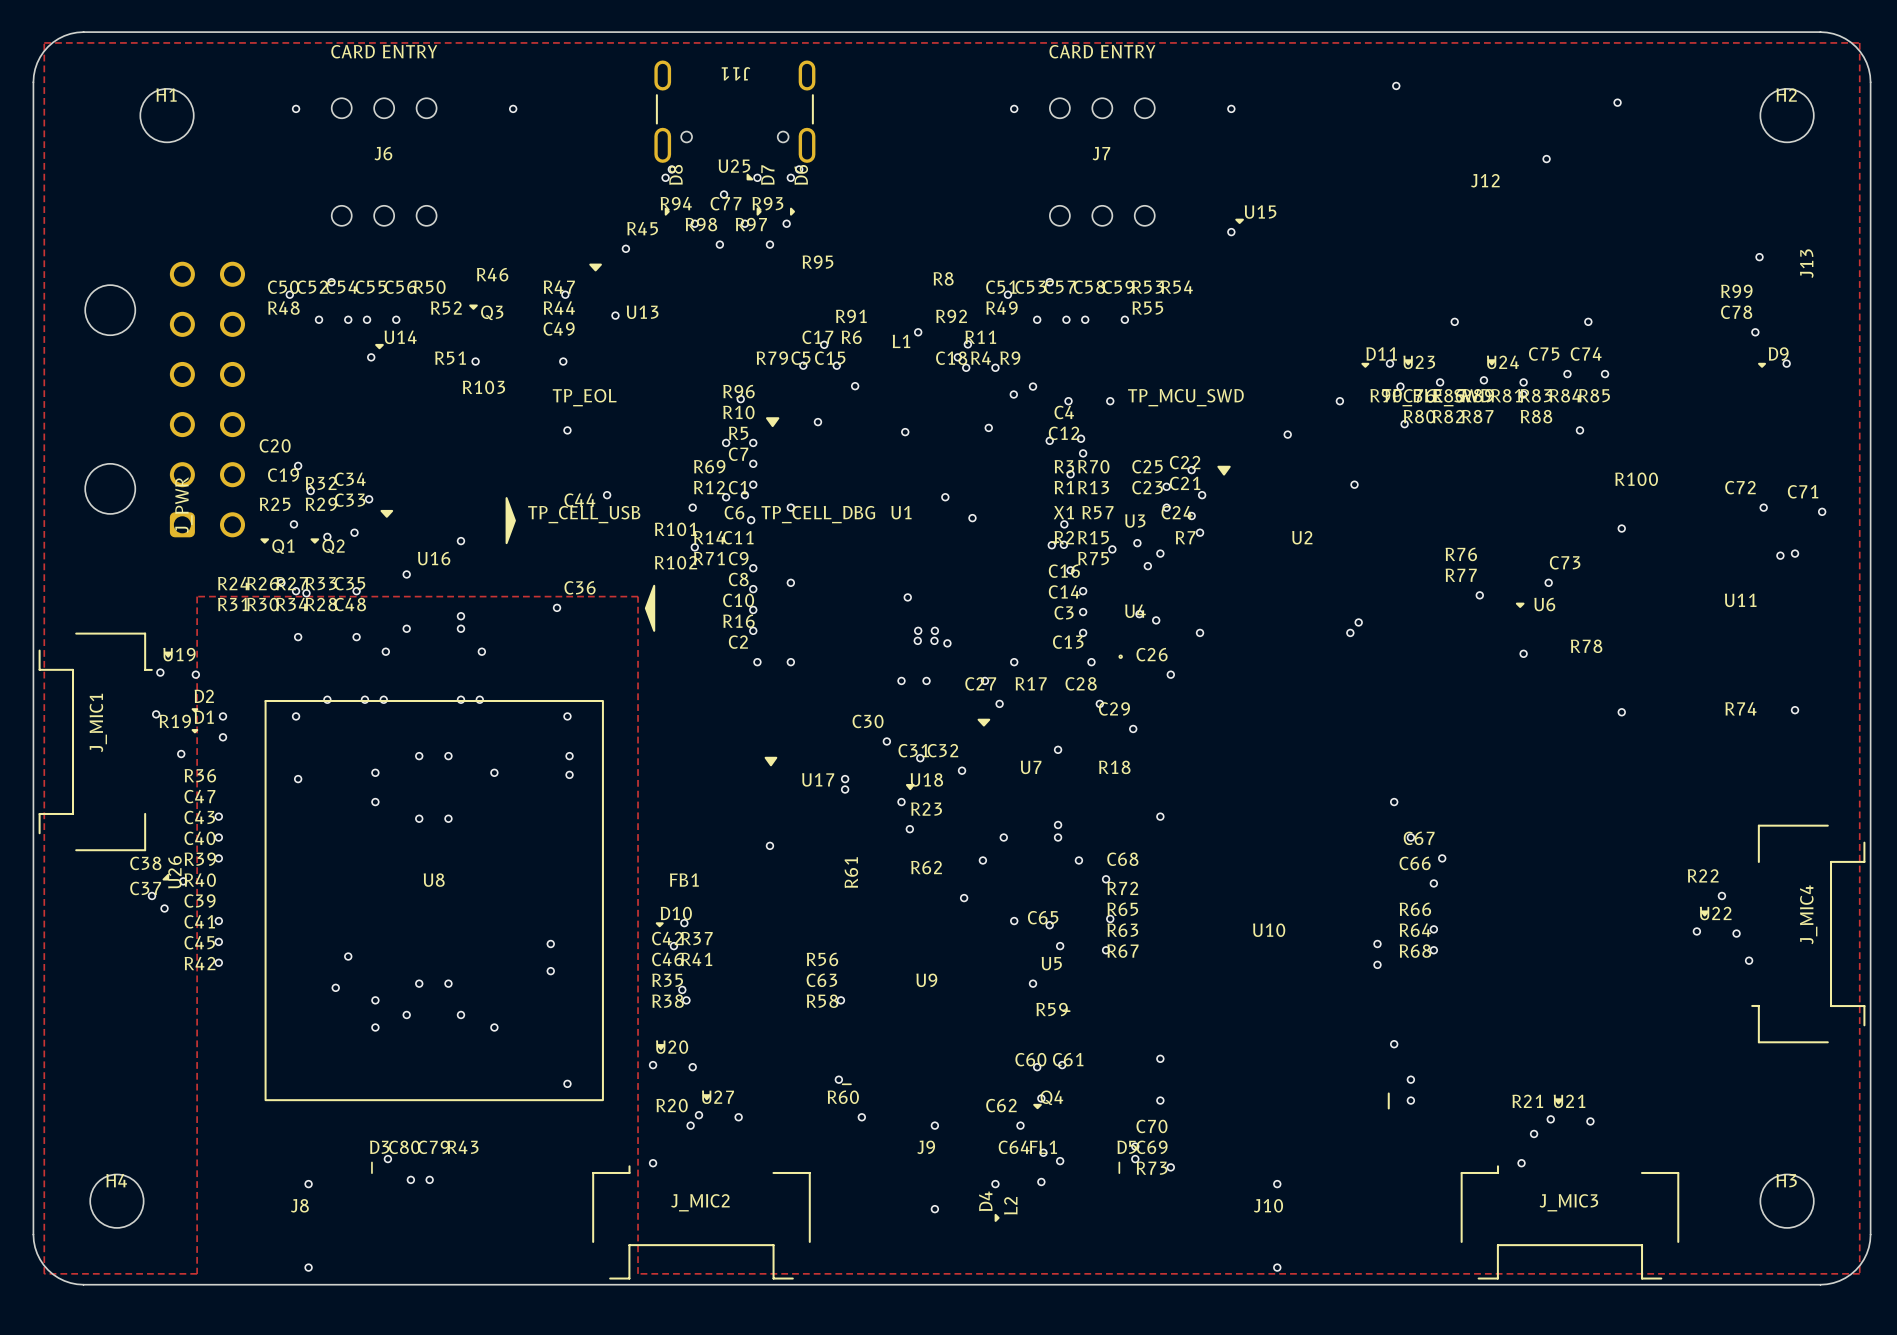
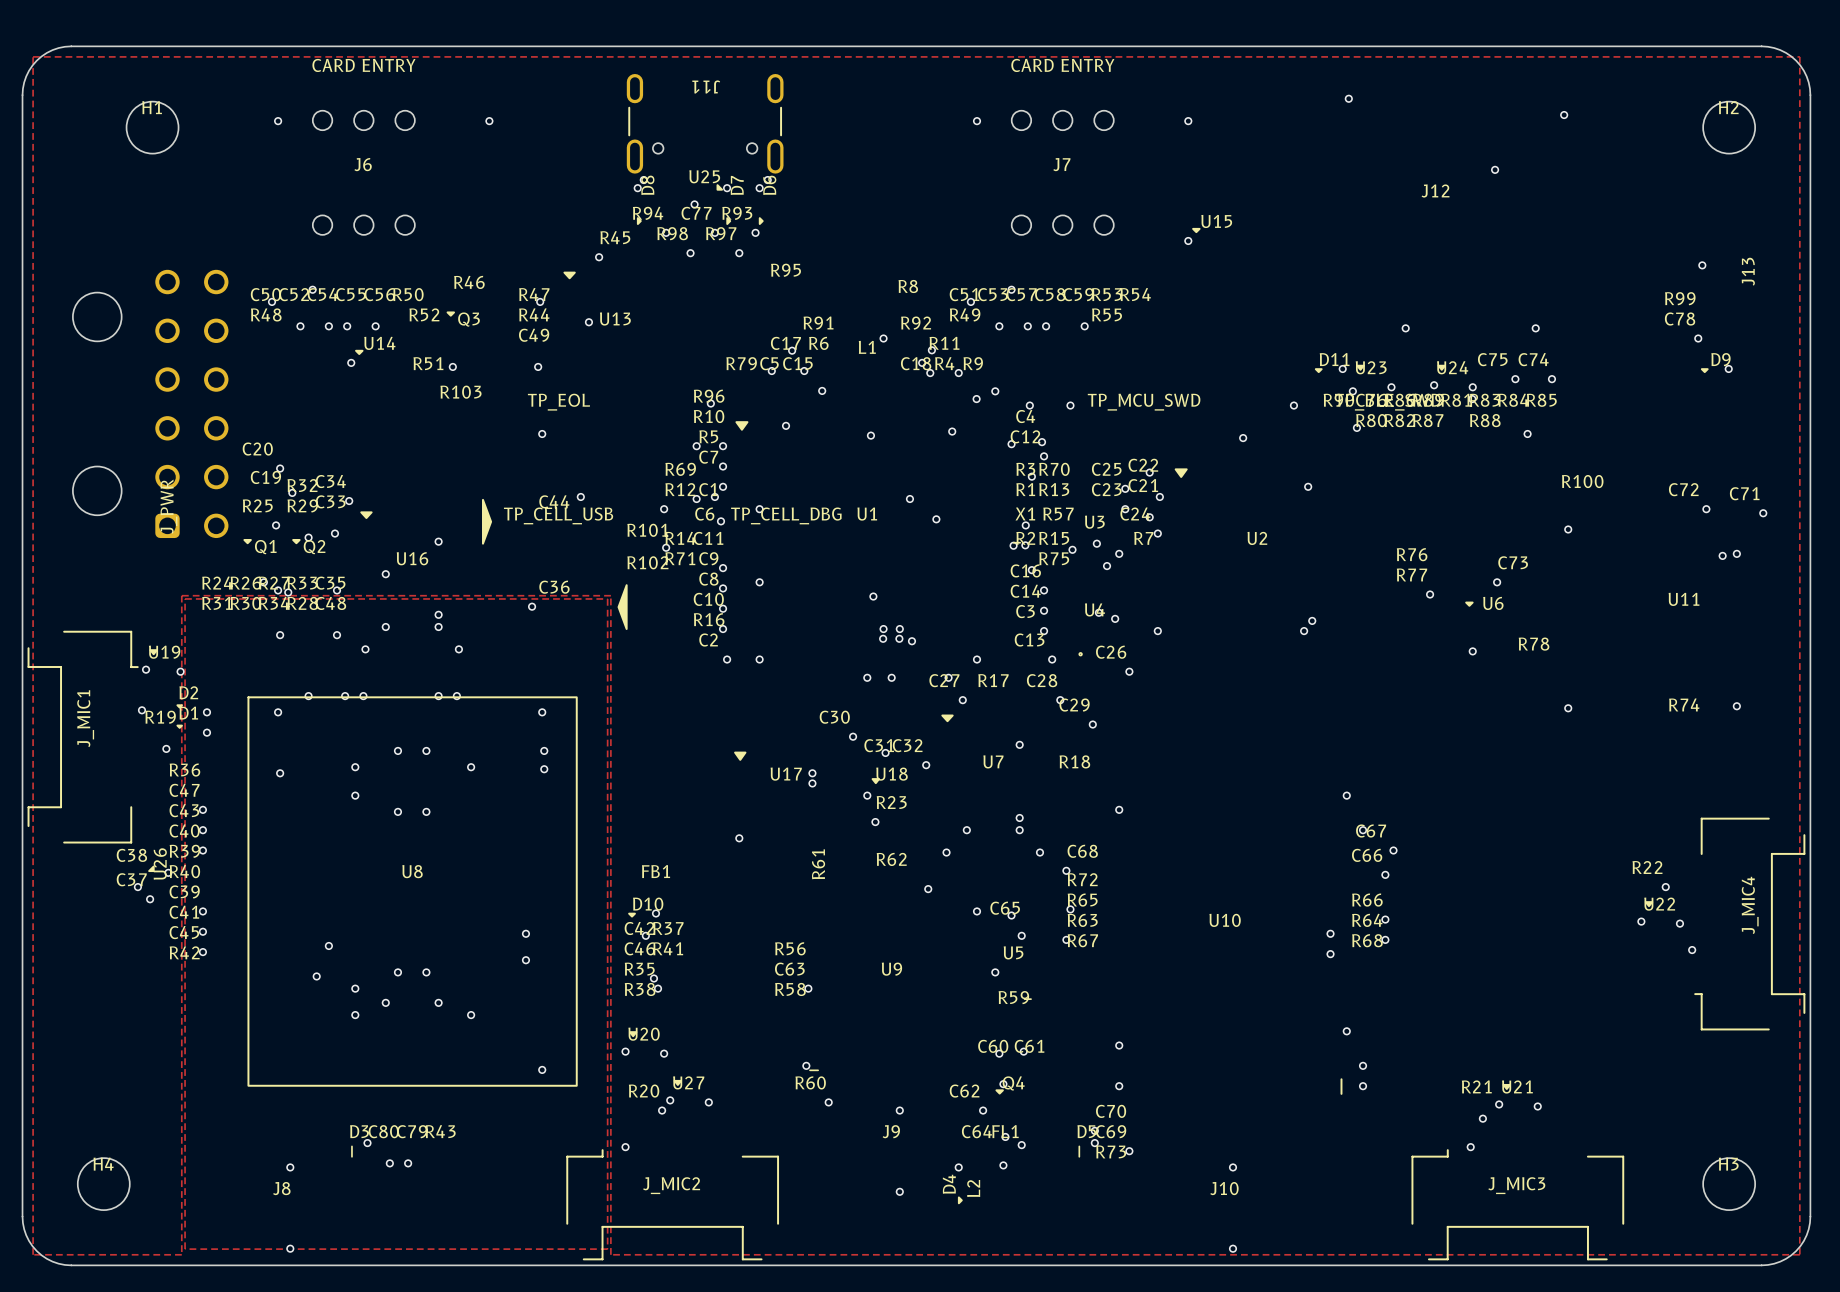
zone outline: none -> (185, 598) (607, 598) (607, 1249) (185, 1249) (185, 598)

